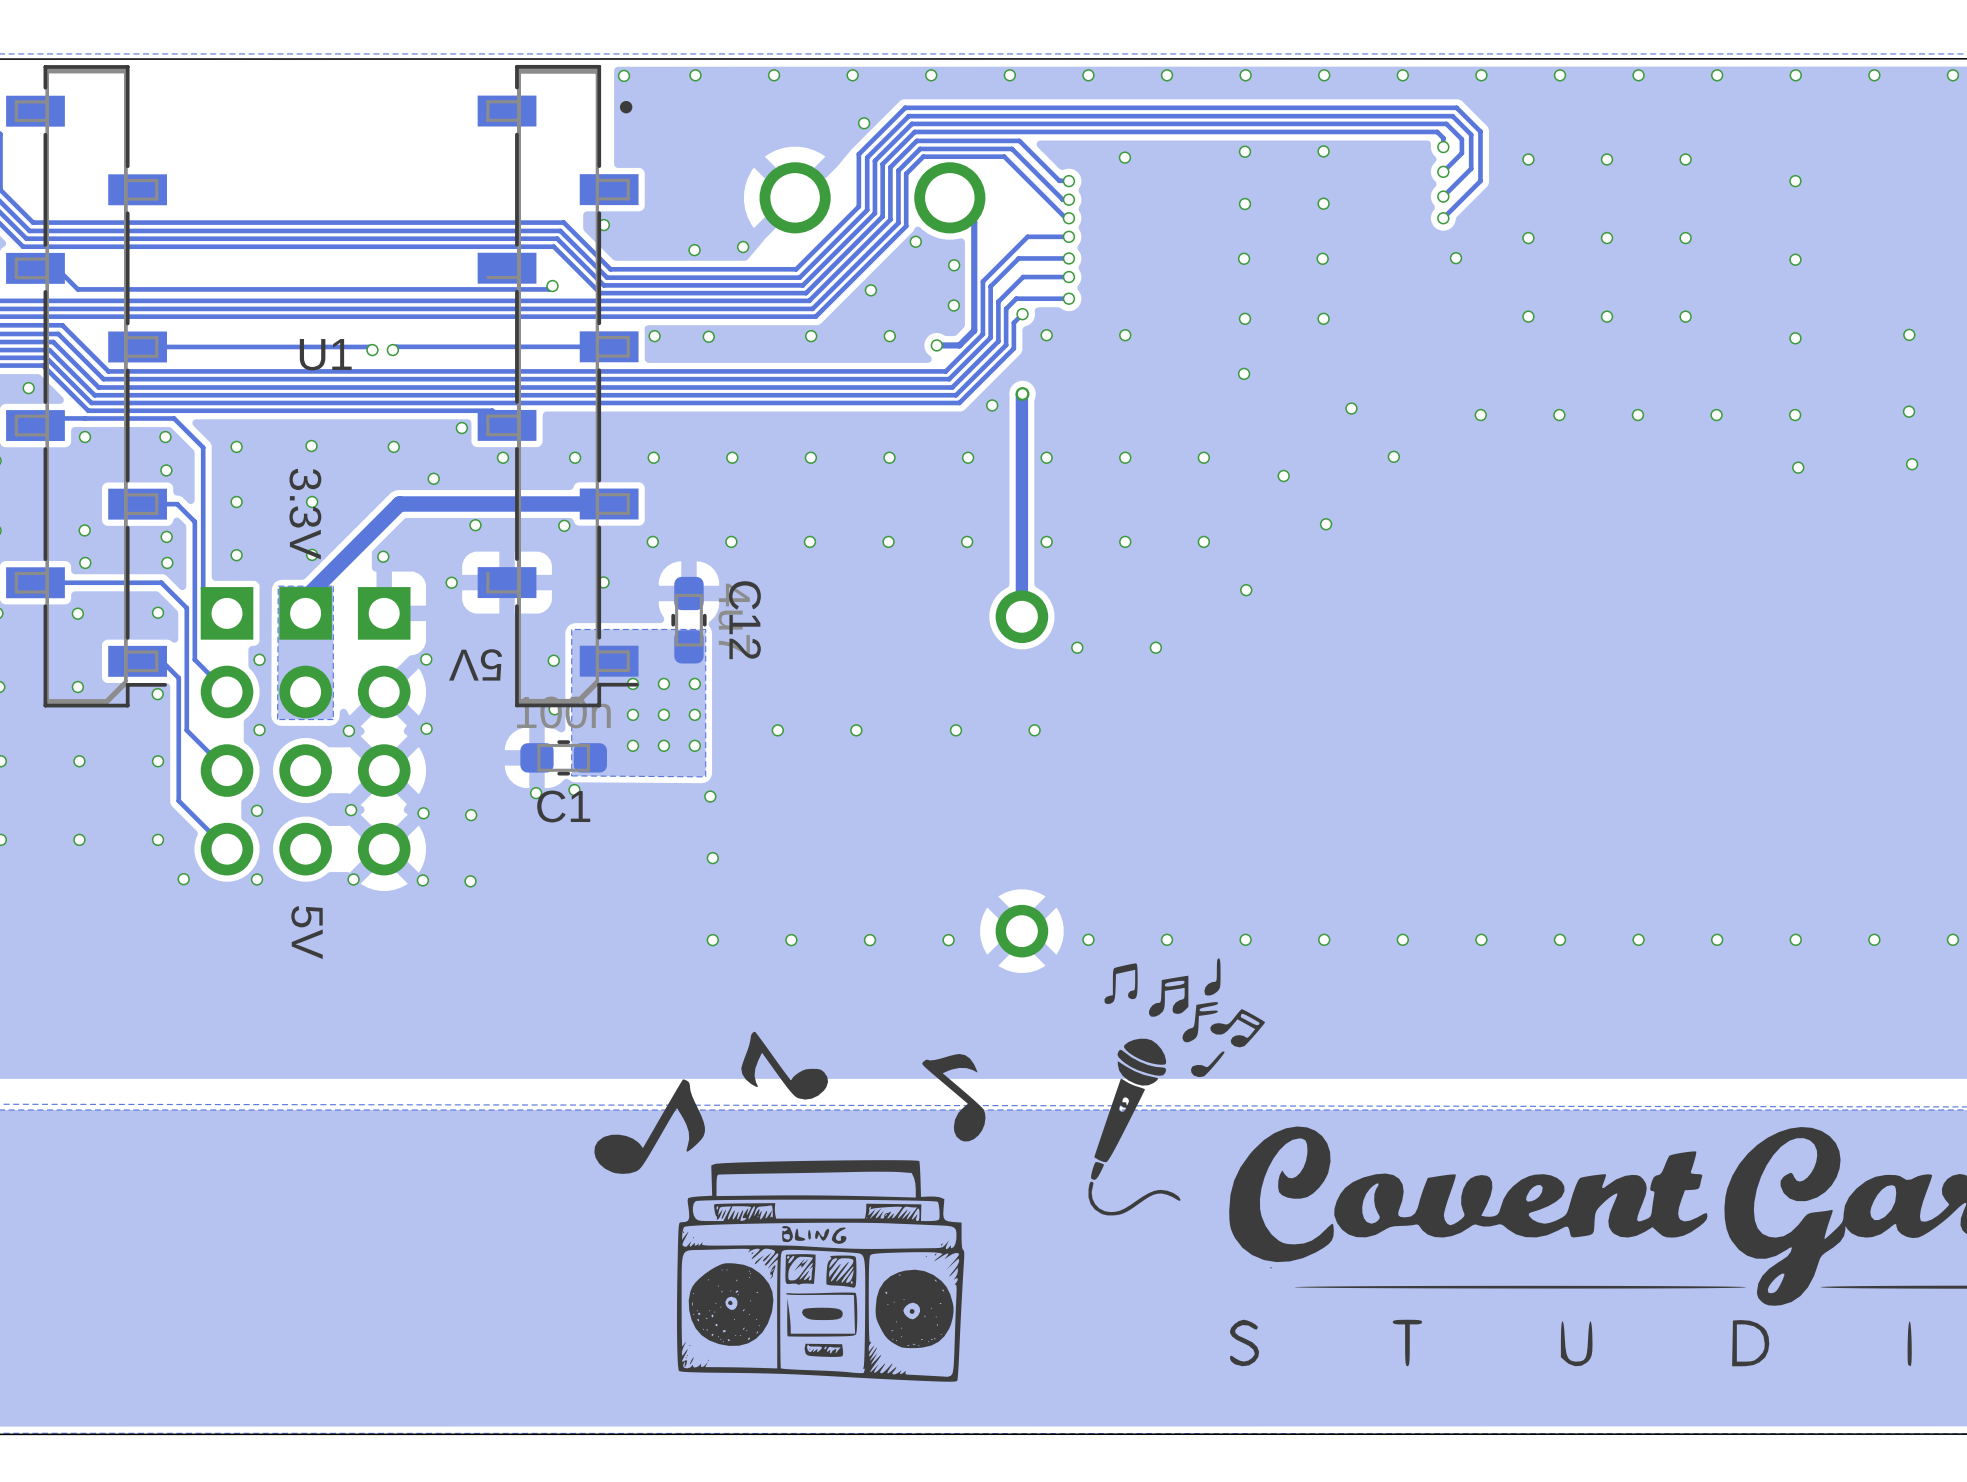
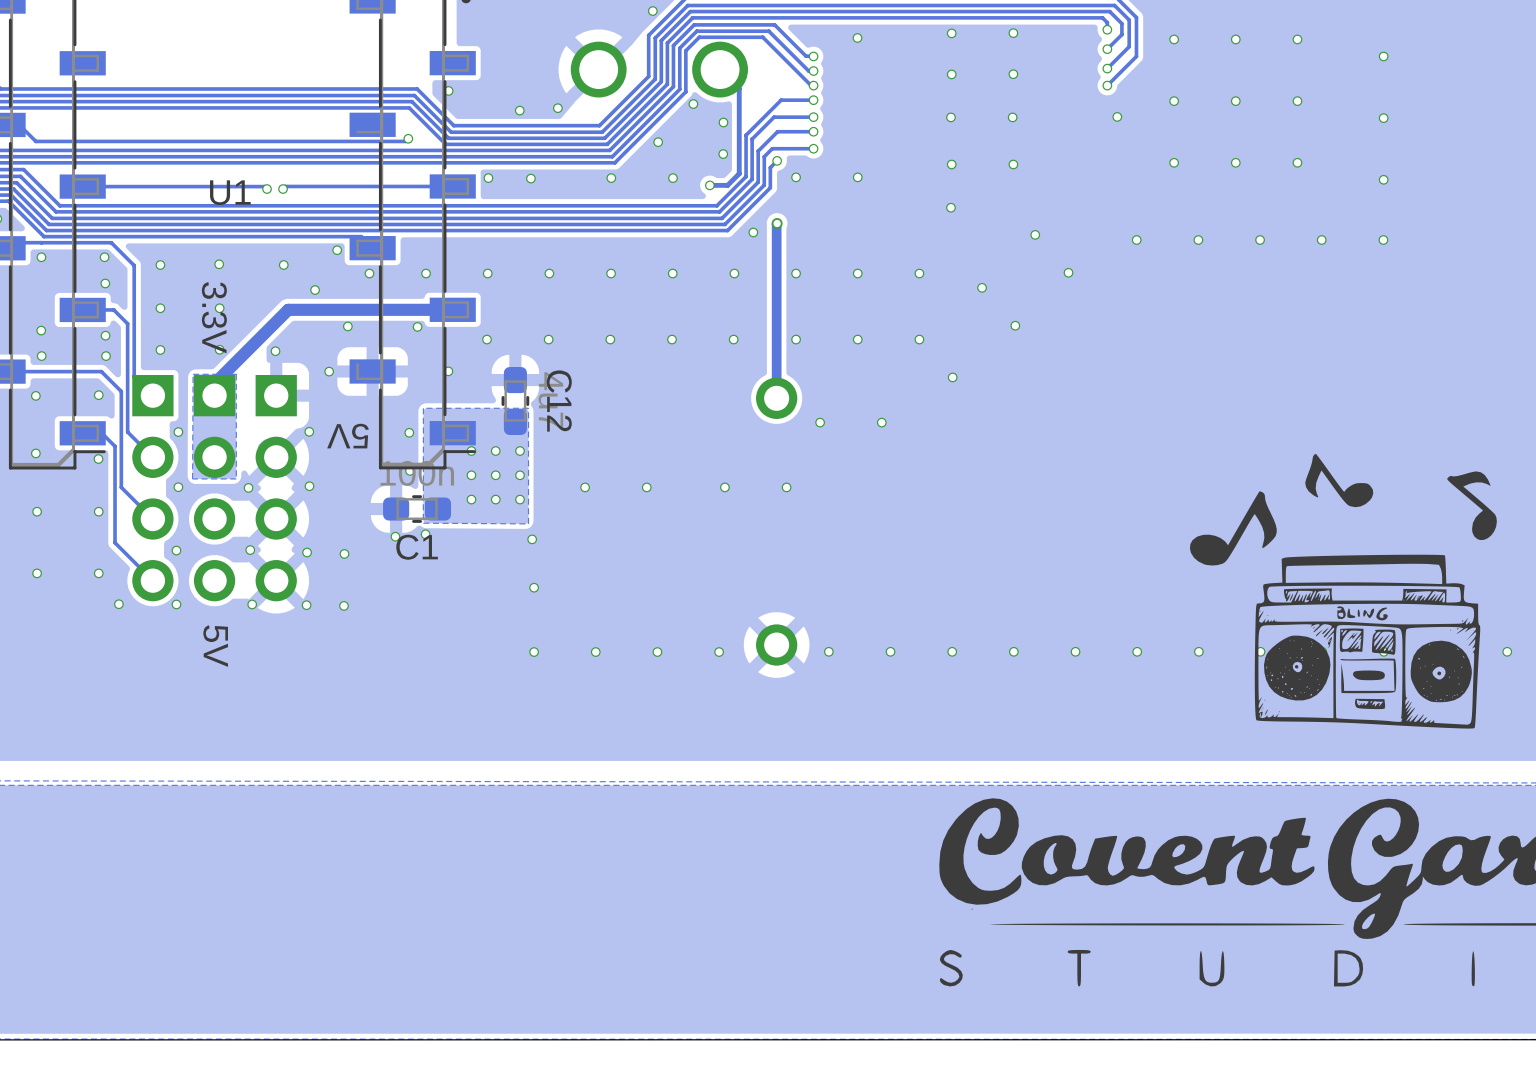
via: (1909, 334) -> none
via: (1909, 411) -> none
via: (1912, 464) -> none
via: (1798, 467) -> none
drawing: none -> [1189, 453, 1497, 729]
drawing: [1088, 958, 1266, 1216] -> none
drawing: [594, 1031, 986, 1382] -> none

